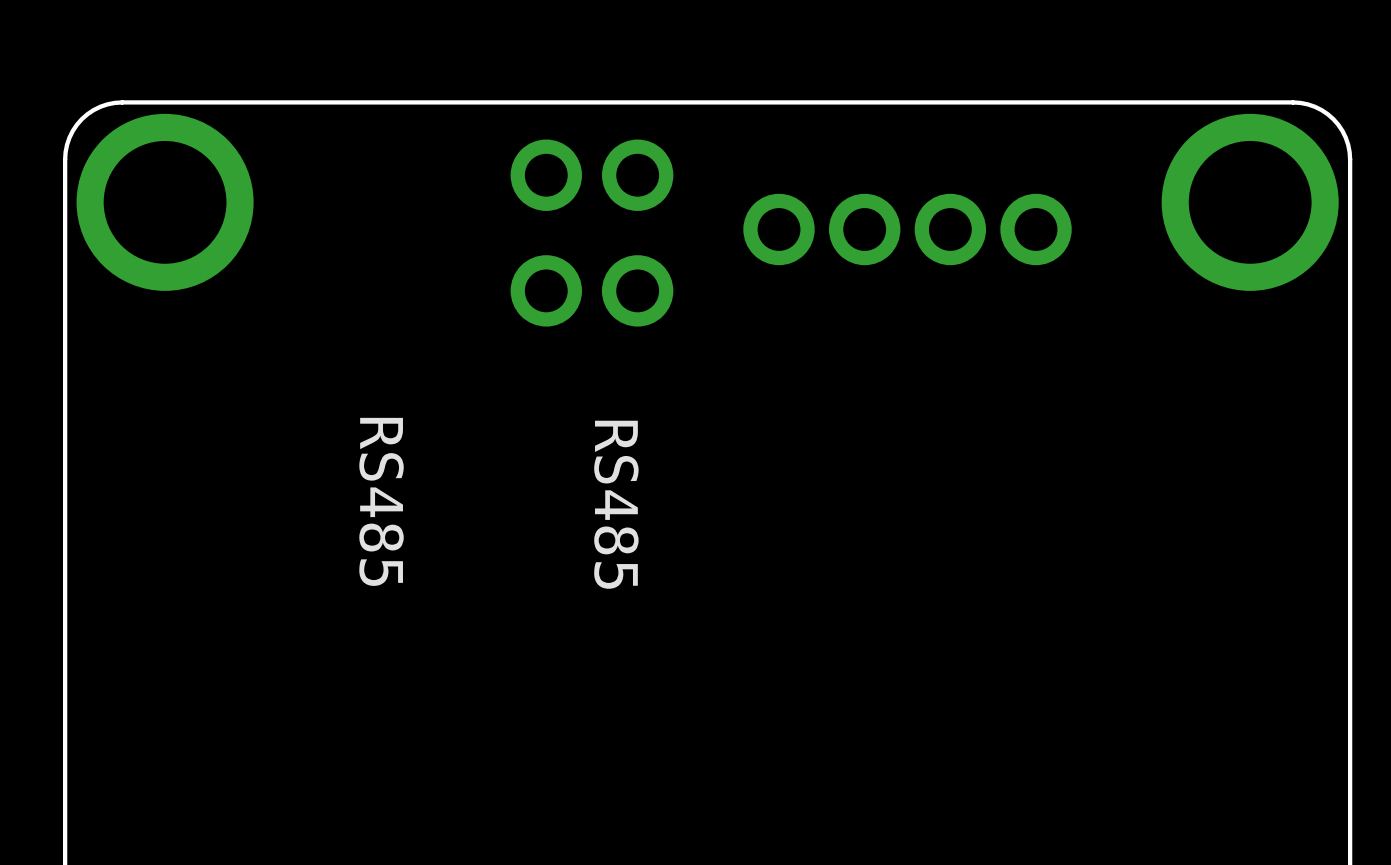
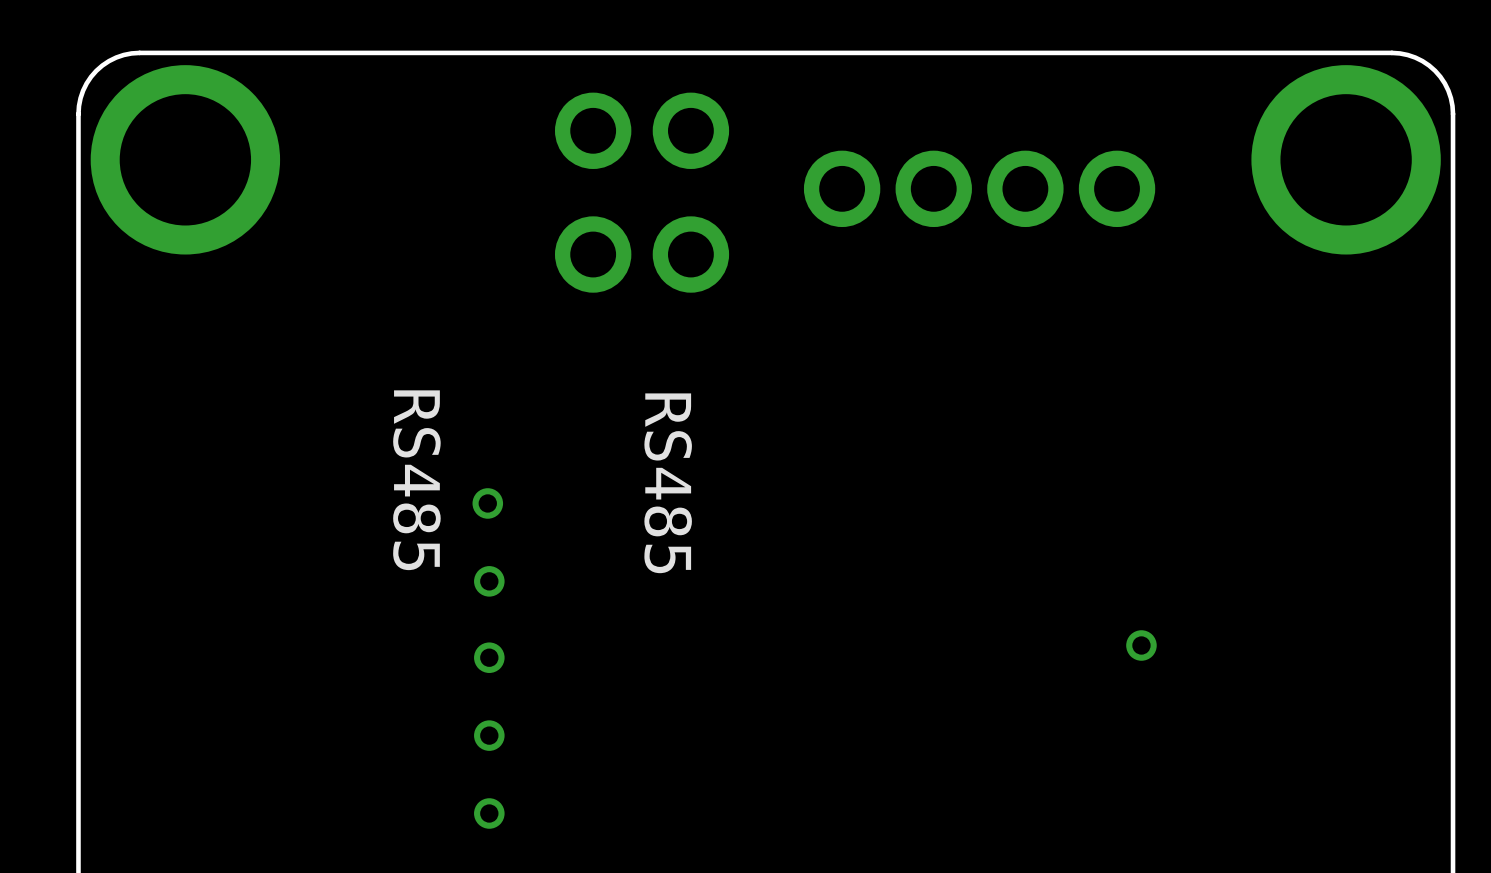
part: none -> (487, 503)
part: none -> (489, 581)
part: none -> (1141, 645)
part: none -> (489, 657)
part: none -> (489, 735)
part: none -> (489, 813)

